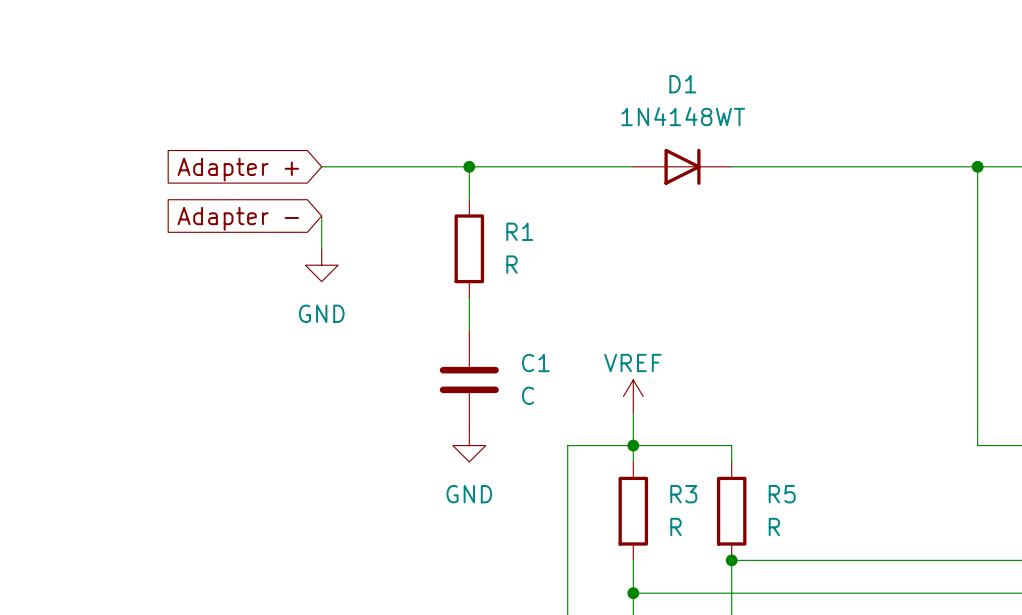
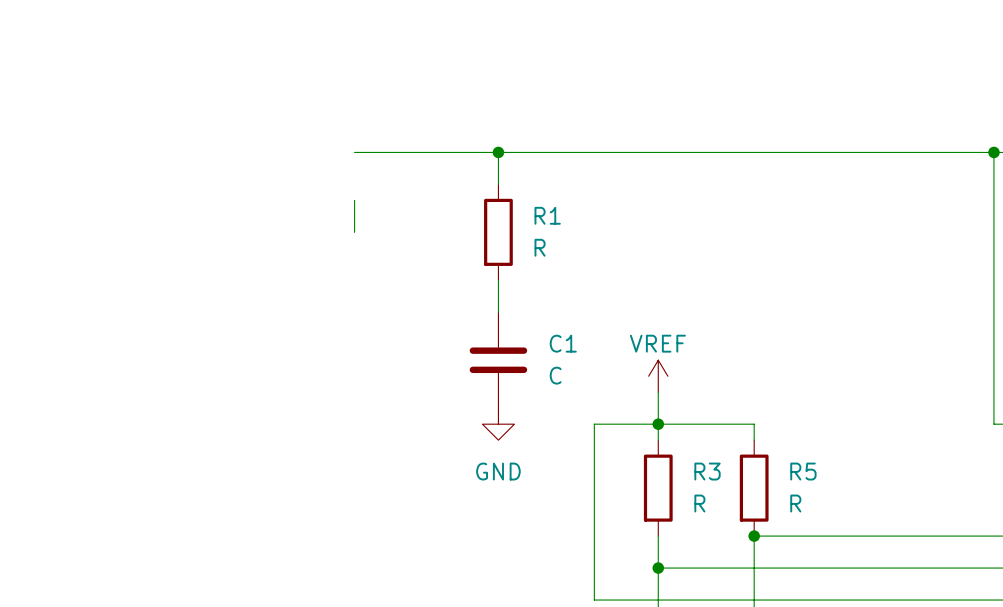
D1: 1N4148WT (682, 166) -> none
global label: Adapter + (238, 169) -> none
global label: Adapter - (238, 218) -> none
power symbol: GND (321, 265) -> none

